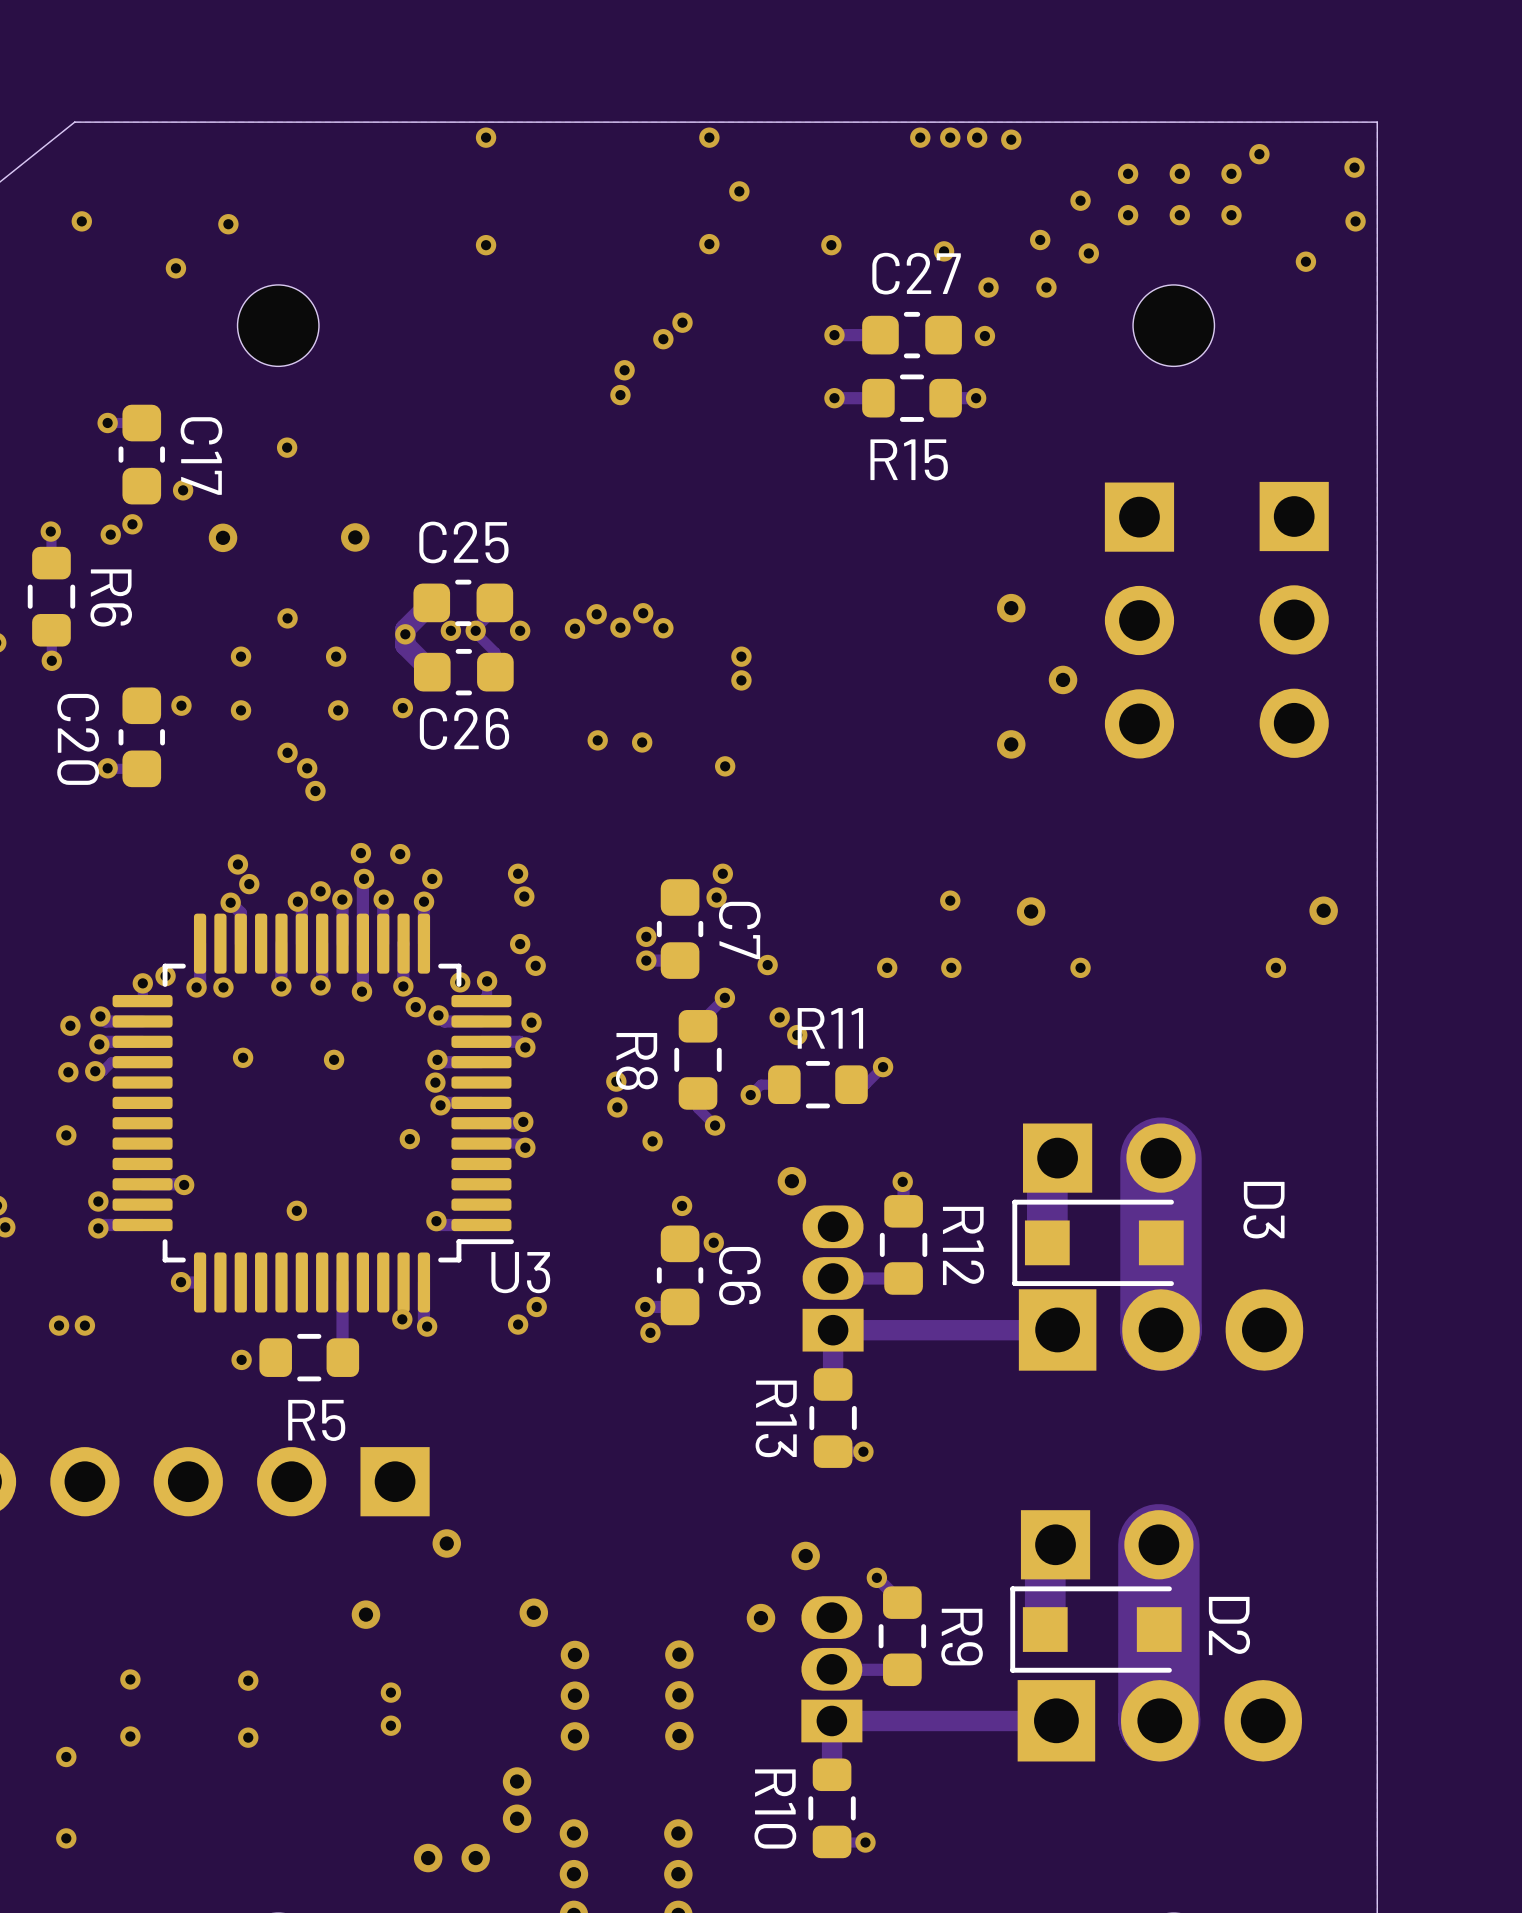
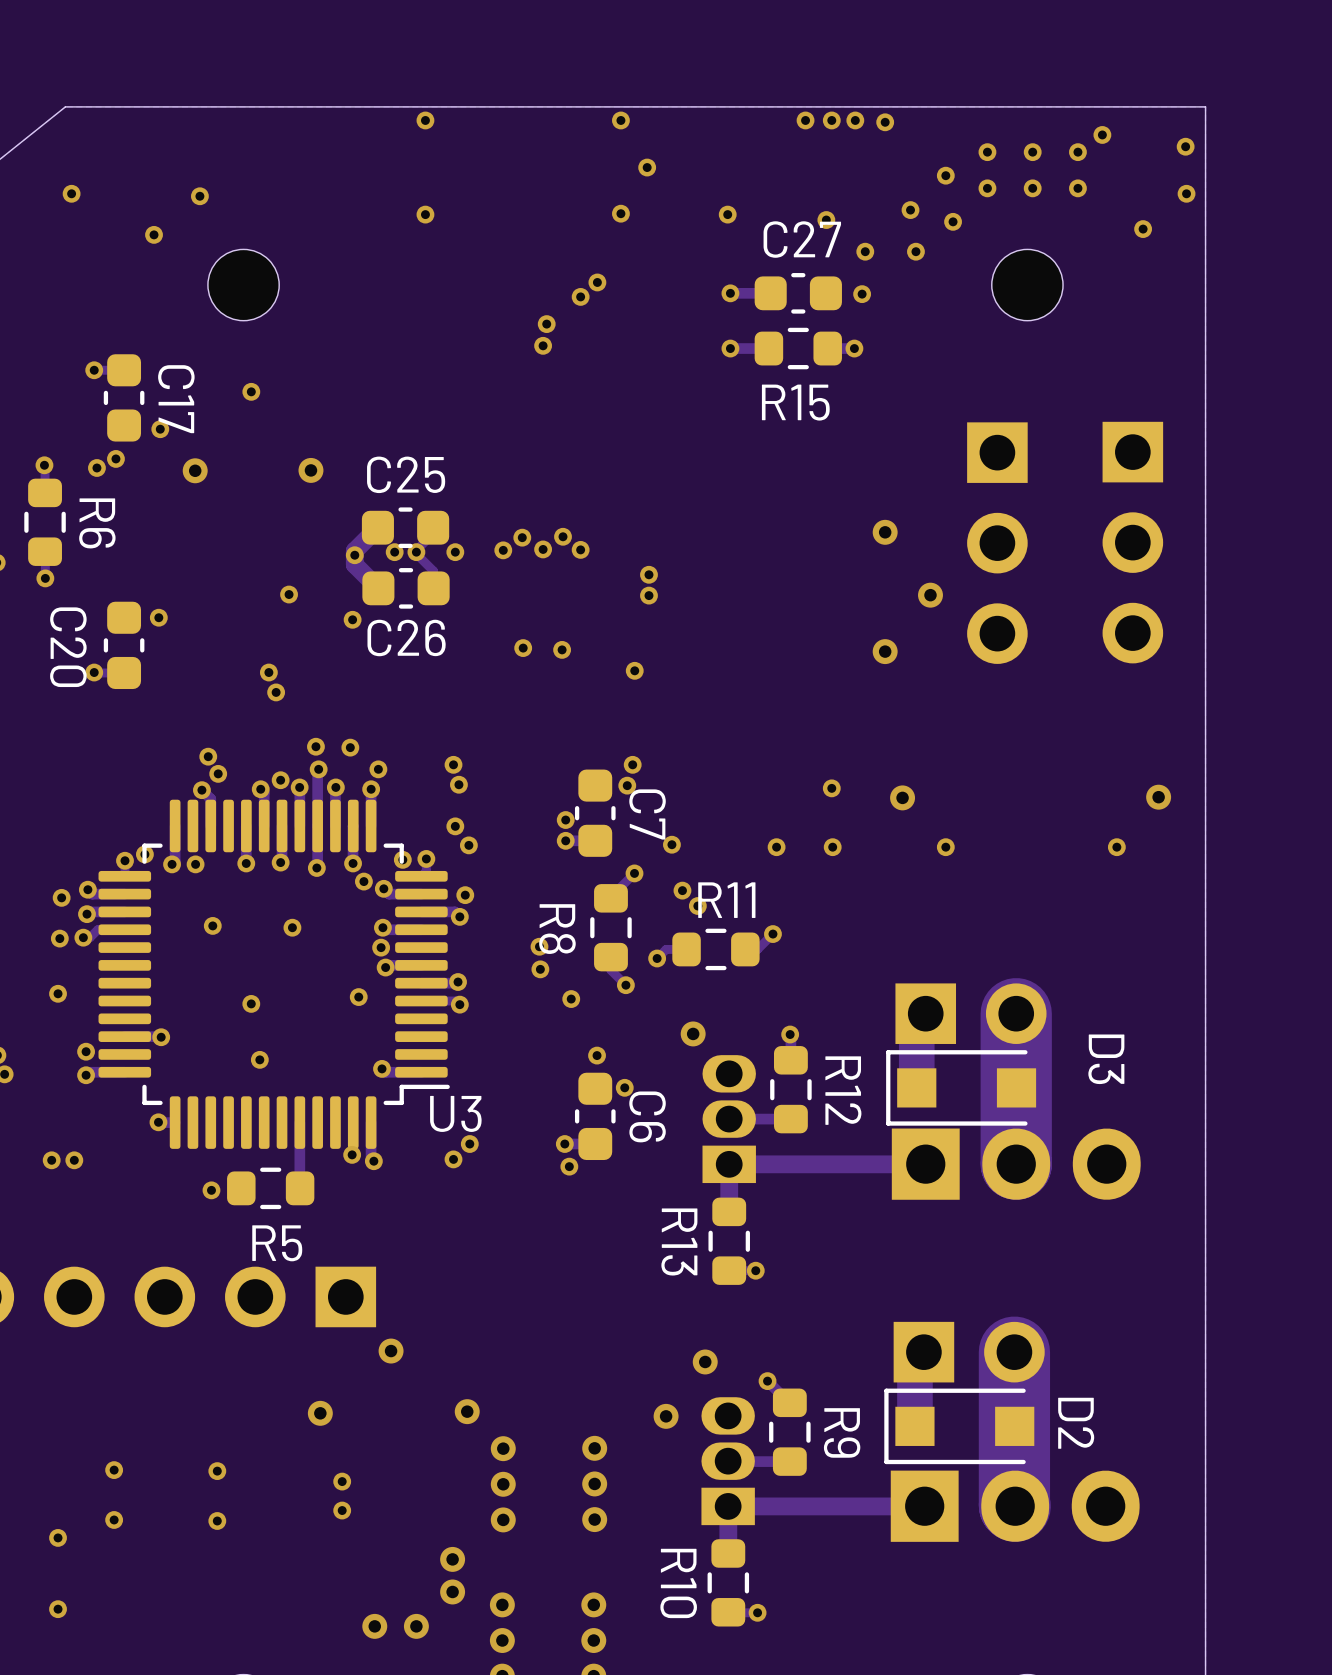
via: (287, 618) -> none
via: (241, 656) -> none
via: (336, 656) -> none
via: none -> (289, 594)
via: (241, 710) -> none
via: (338, 710) -> none
via: (287, 752) -> none
via: none -> (251, 1003)

